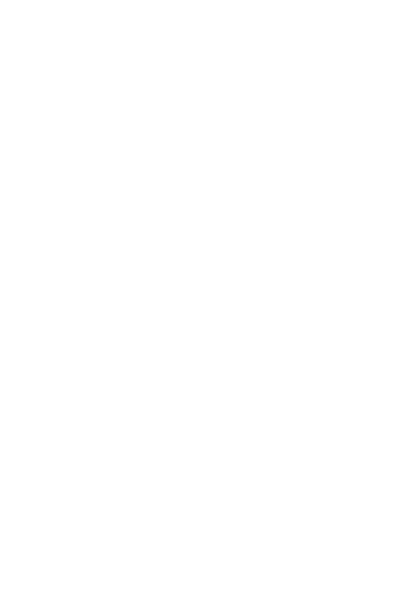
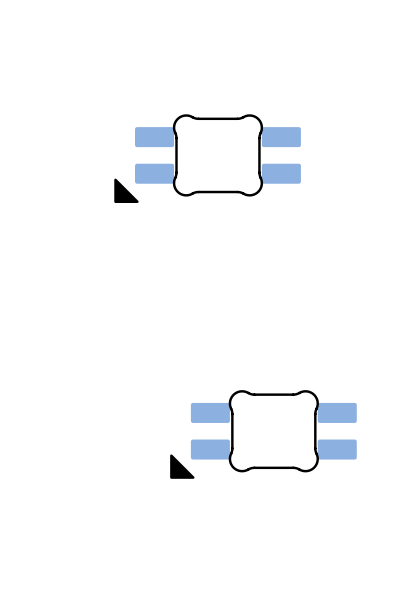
part: none -> (207, 158)
part: none -> (263, 434)

